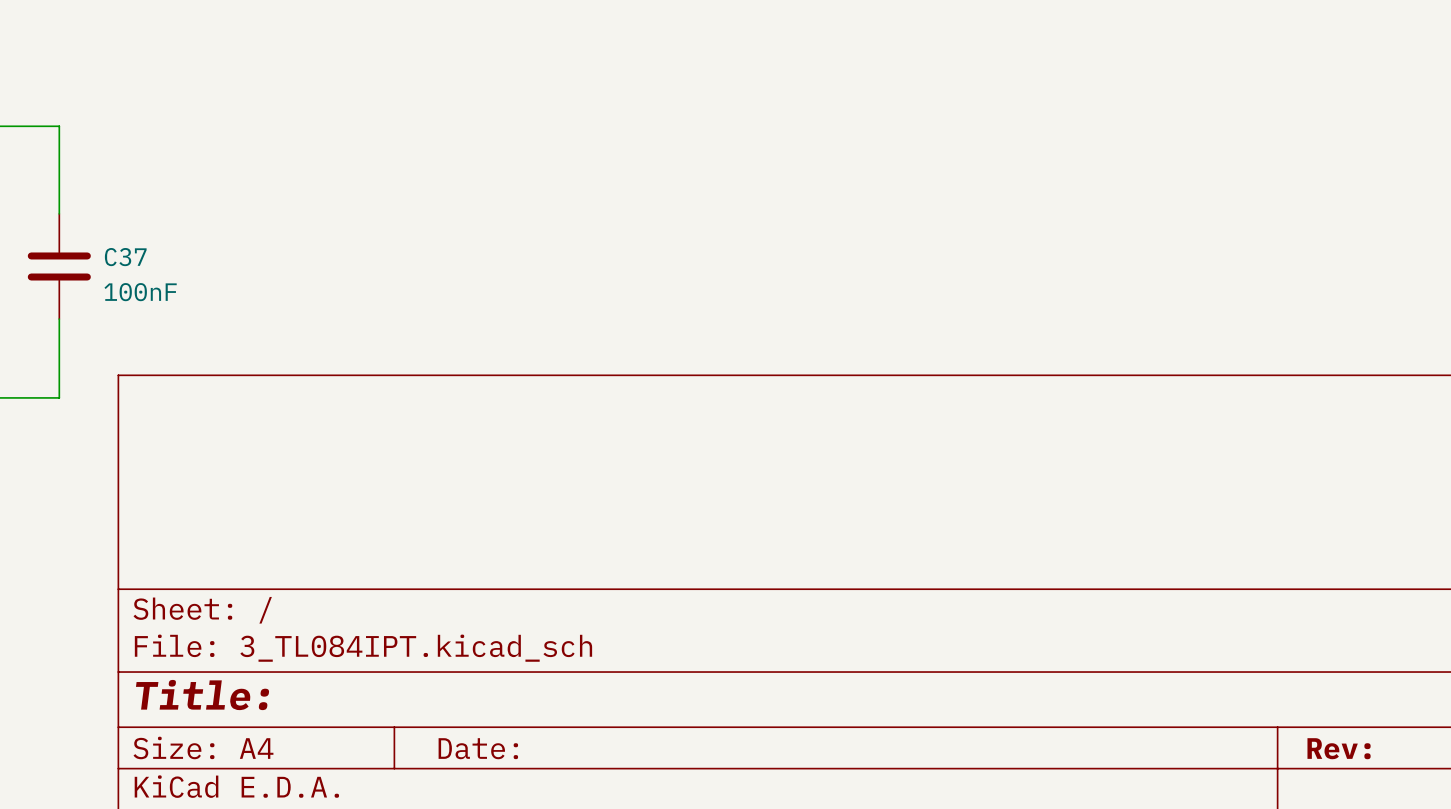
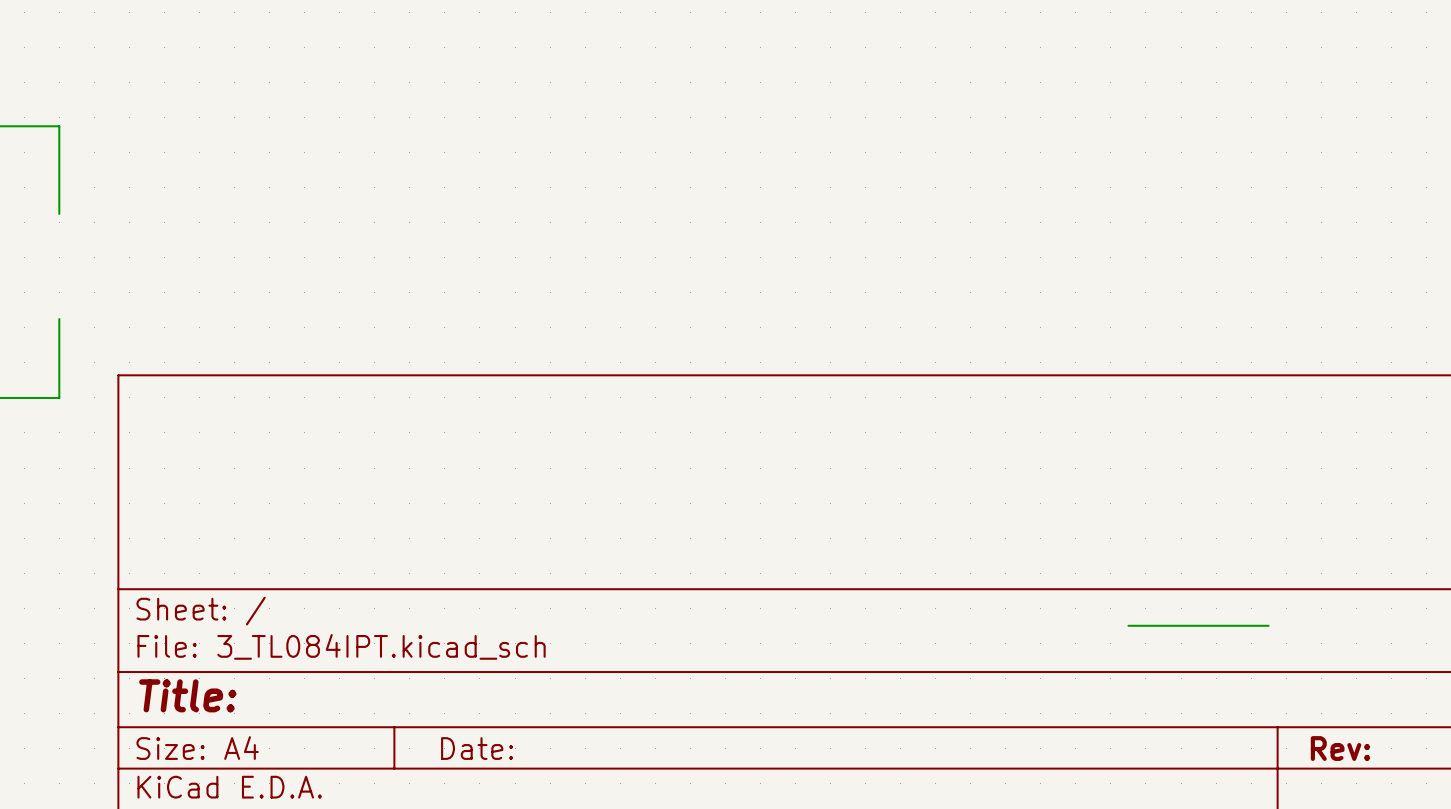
C37: 100nF (59, 266) -> none
wire: none -> (1128, 625) (1268, 625)

